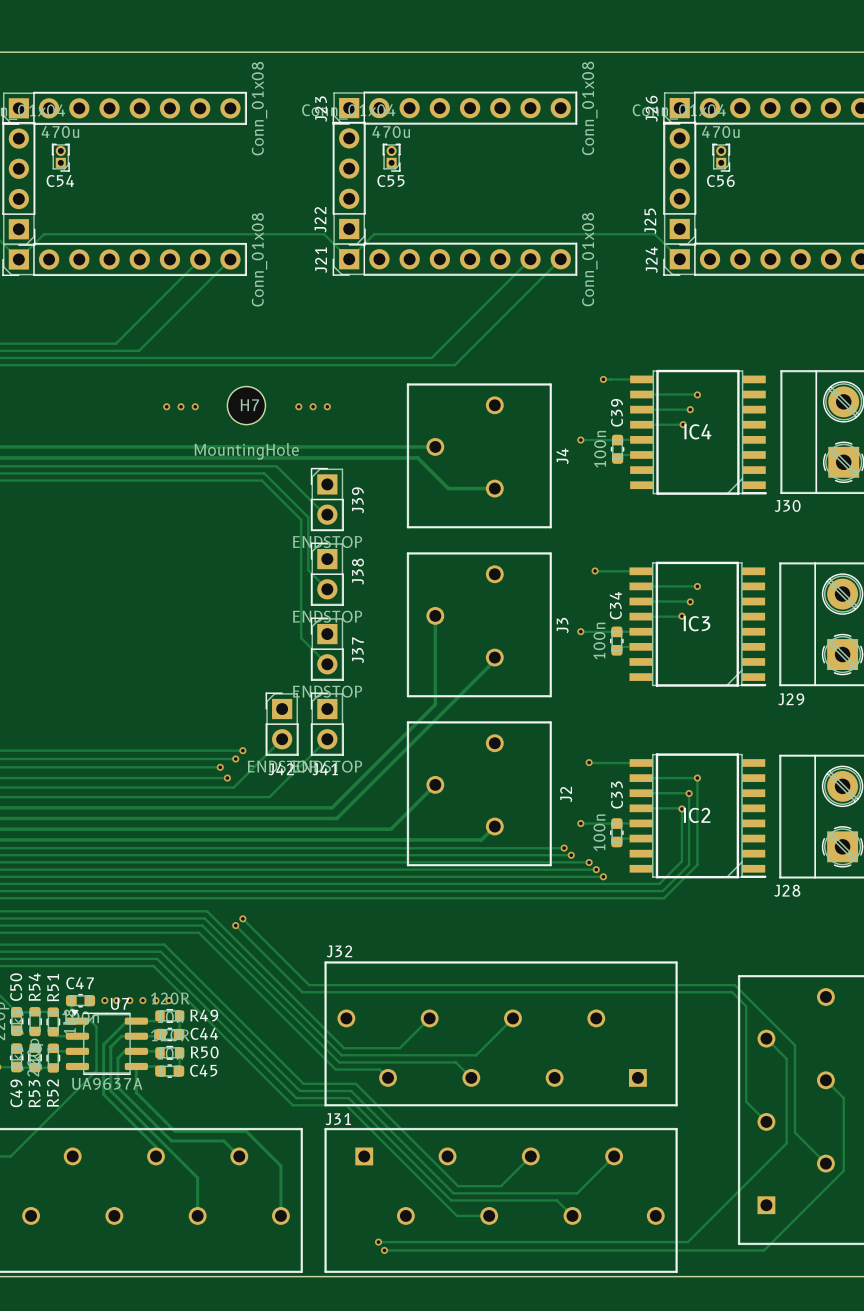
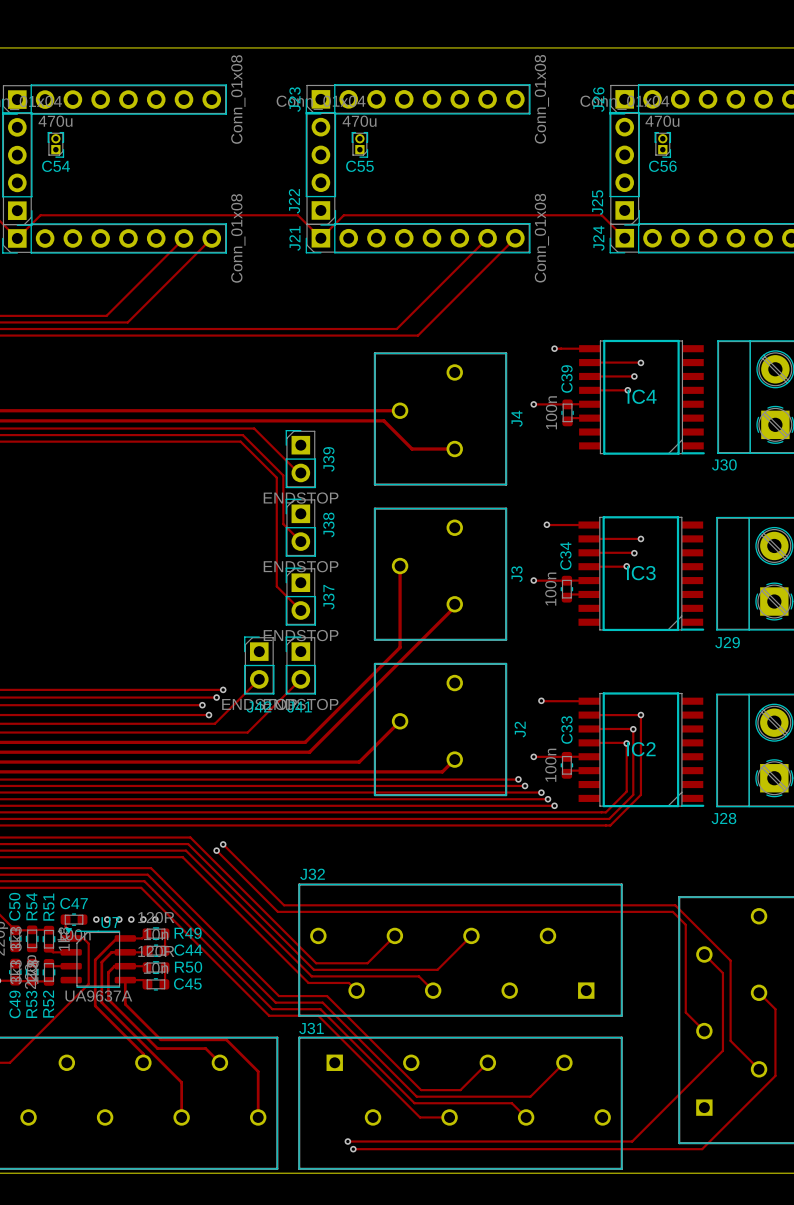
H7: MountingHole (246, 405) -> none
via: (166, 406) -> none
via: (180, 406) -> none
via: (195, 406) -> none
via: (298, 406) -> none
via: (313, 406) -> none
via: (327, 406) -> none

